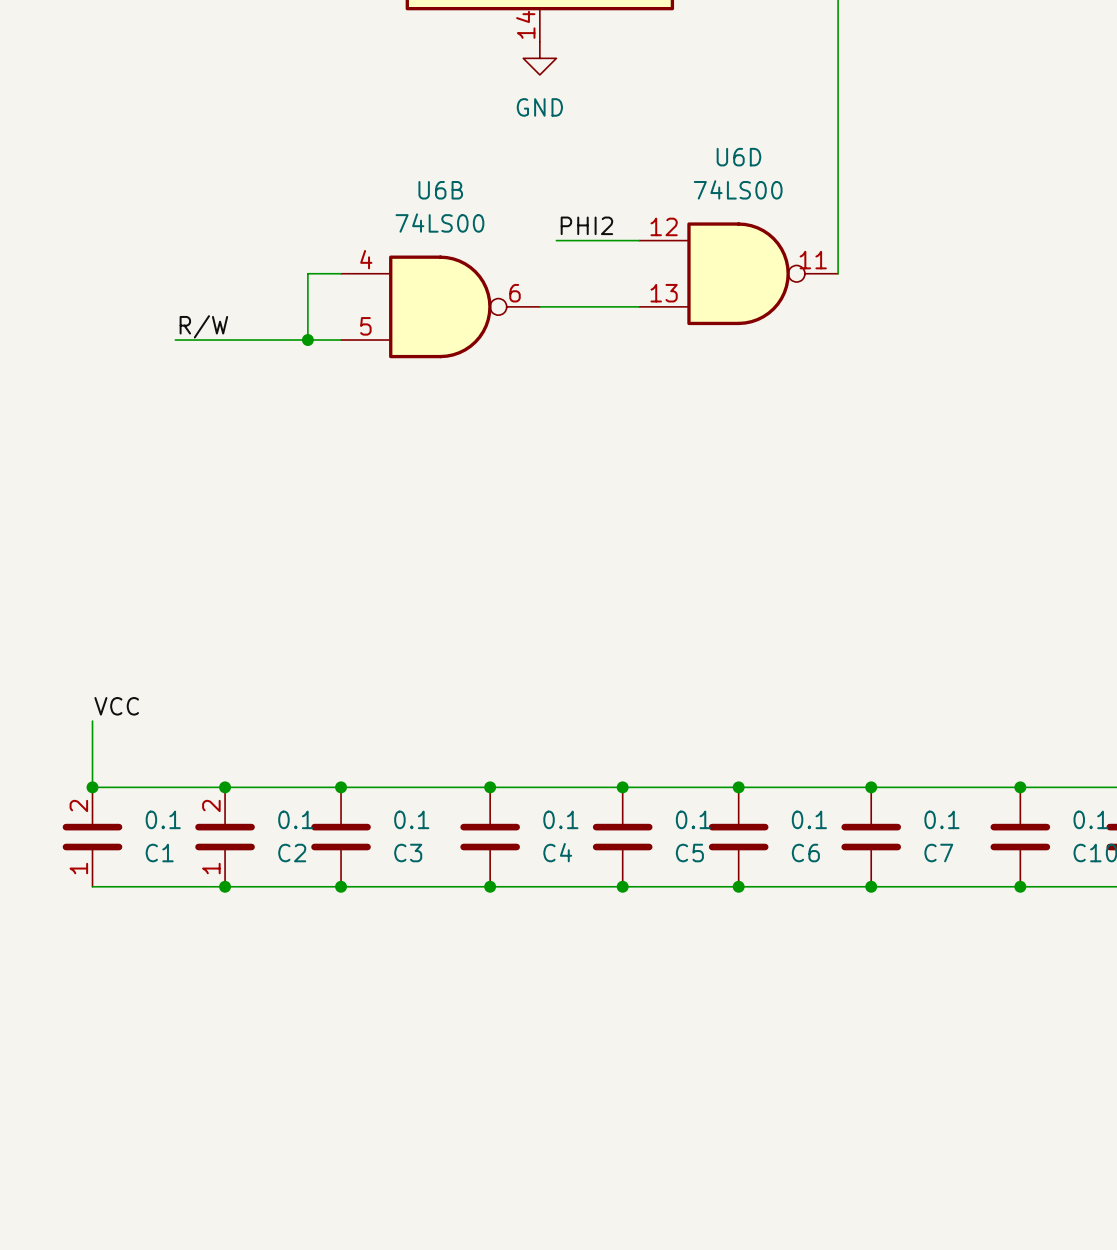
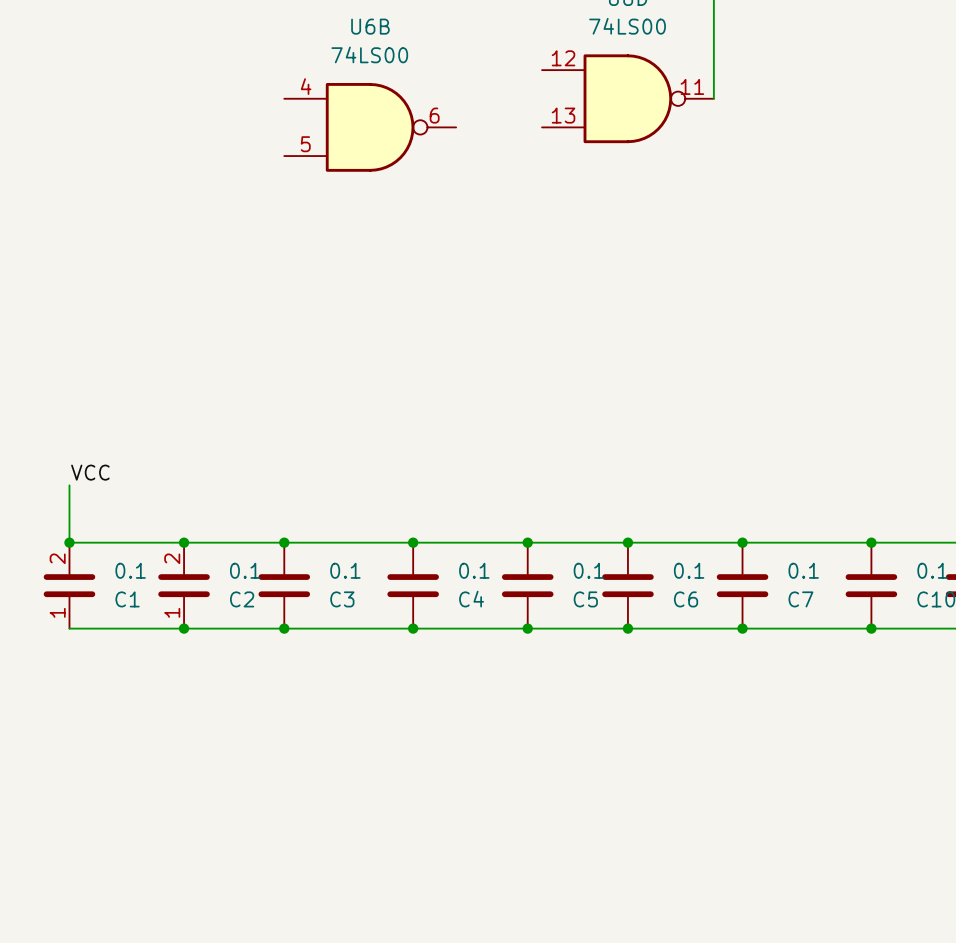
label: PHI2 (586, 225) -> none
wire: (556, 240) (639, 240) -> none
wire: (341, 273) (307, 273) (307, 340) -> none
wire: (539, 306) (639, 306) -> none
label: R/W (203, 326) -> none
wire: (175, 340) (341, 340) -> none
junction: (307, 340) -> none

